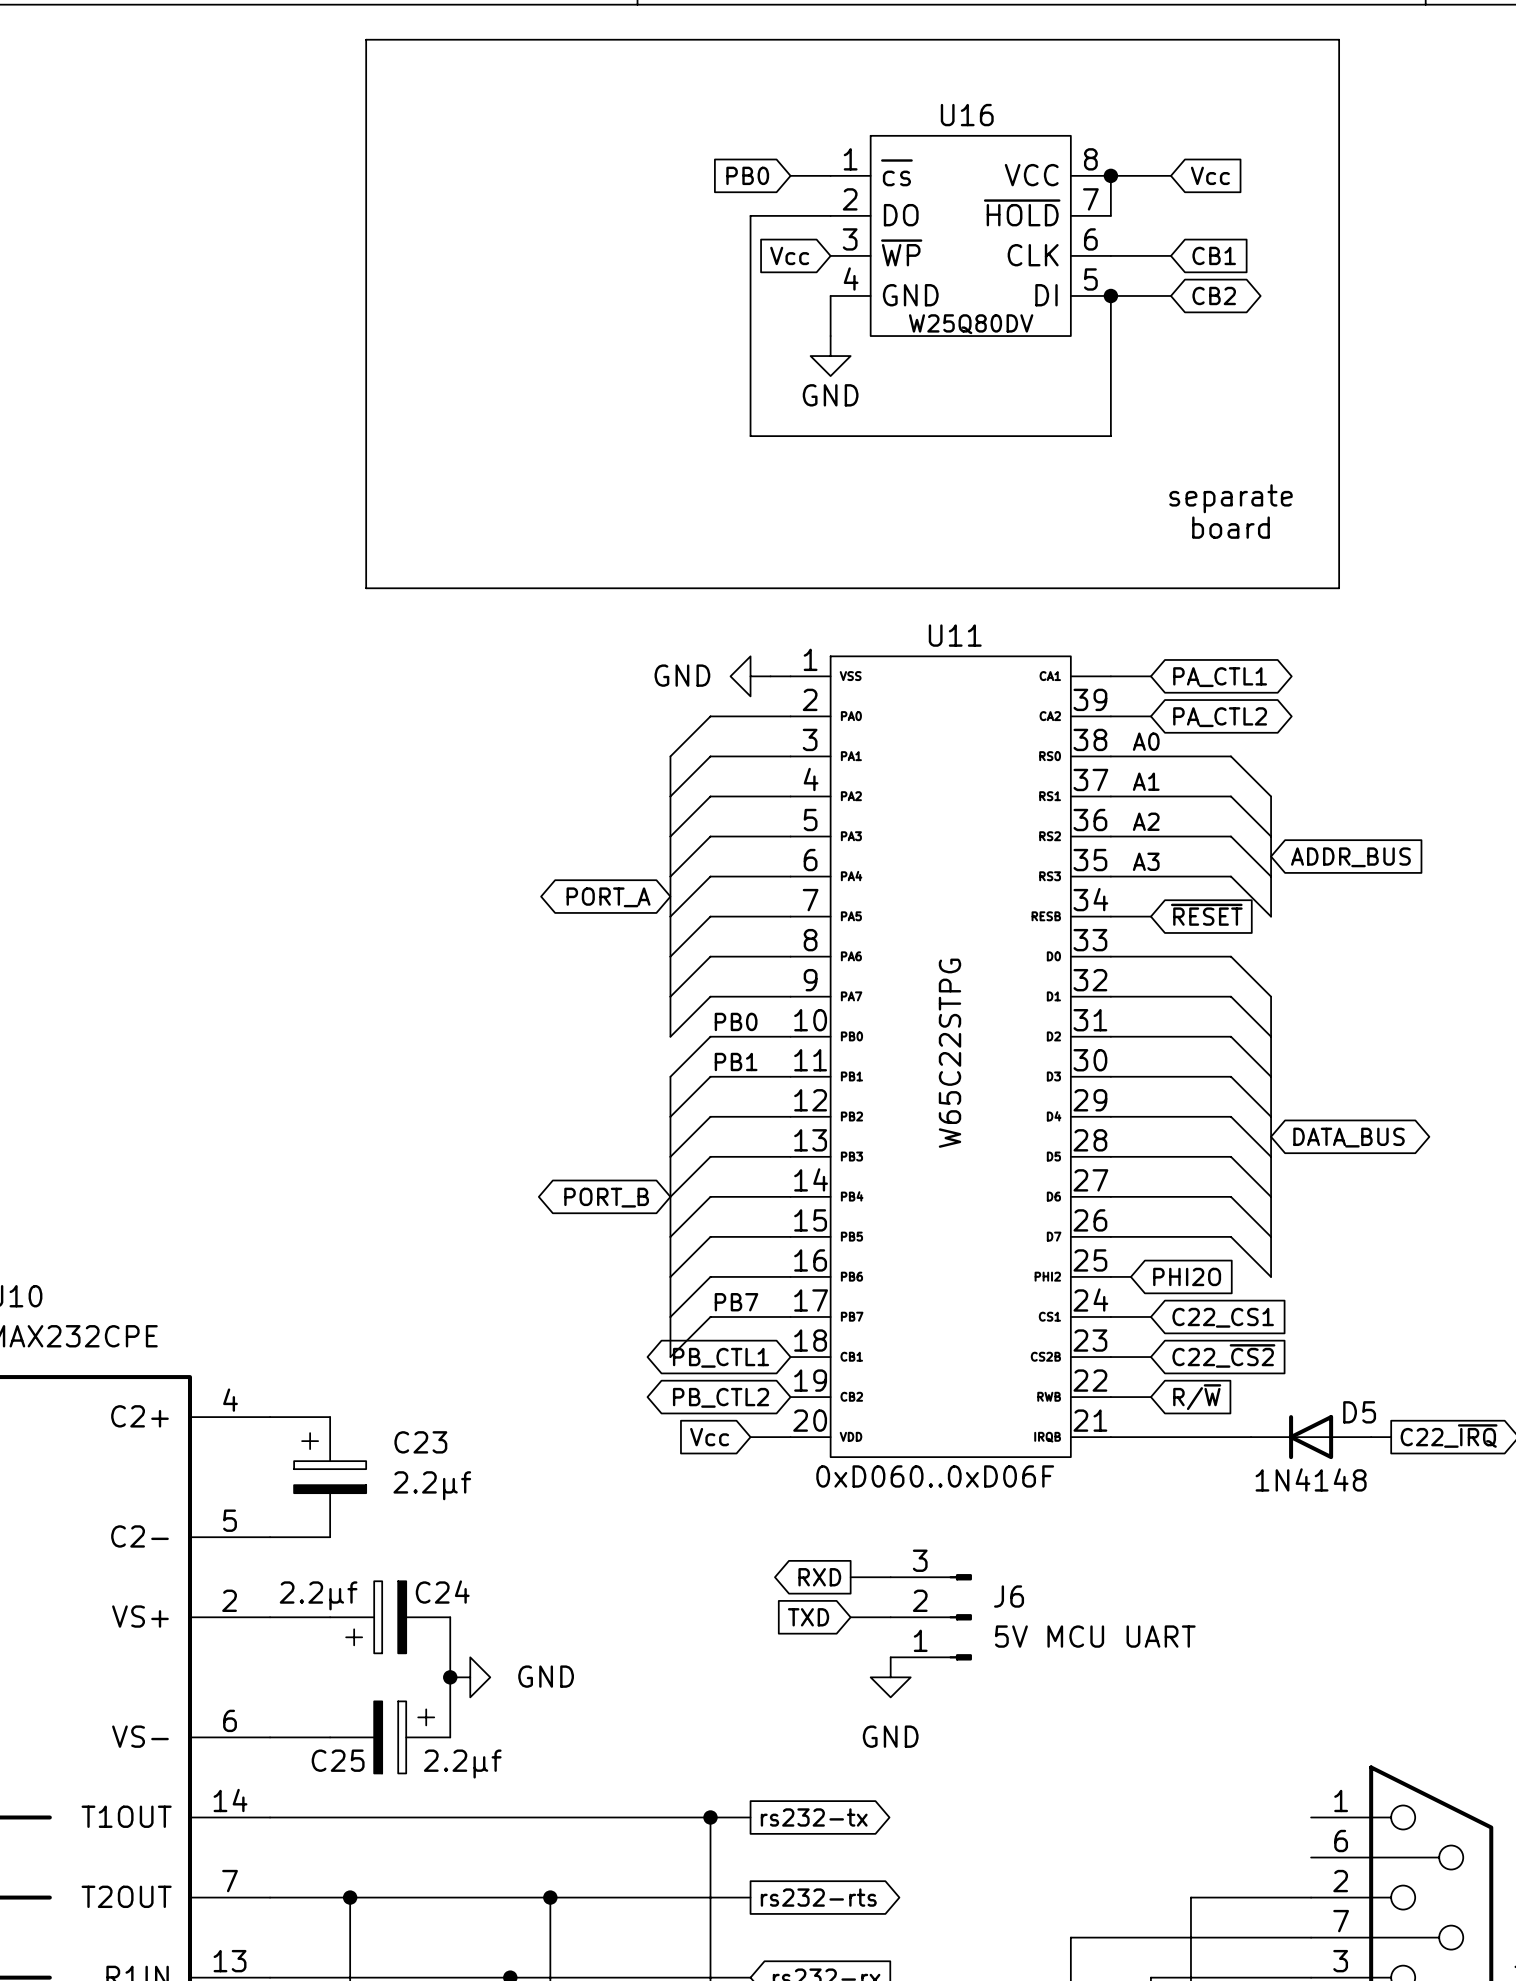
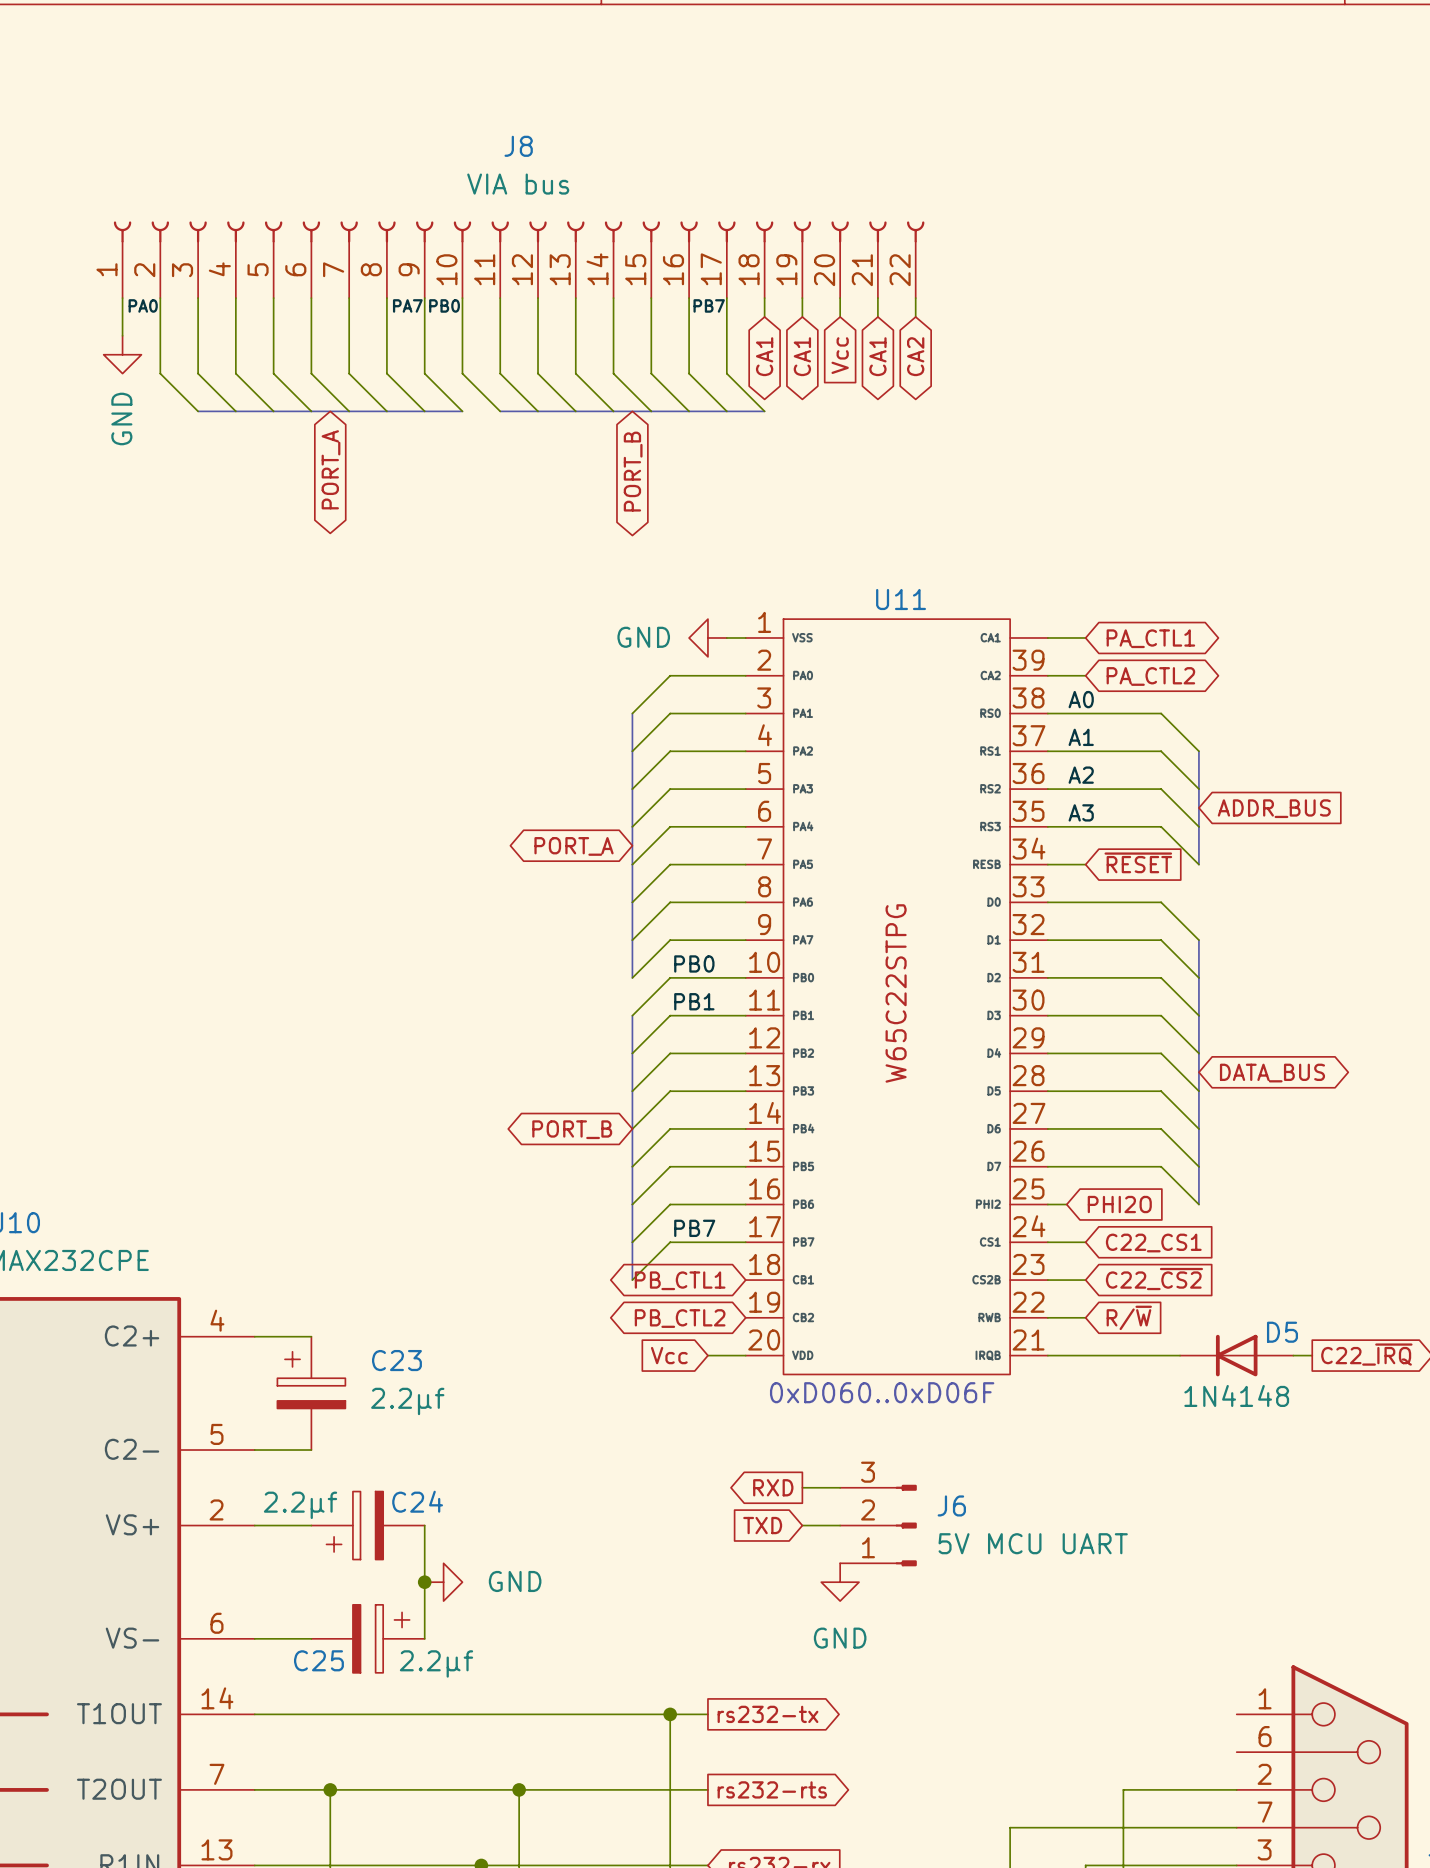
line: (366, 39) (1339, 39) (1339, 588) (366, 588) (366, 39) -> none
global label: PB0 (747, 175) -> none
wire: (790, 175) (830, 175) -> none
junction: (1110, 175) -> none
wire: (1170, 175) (1110, 175) (1110, 215) -> none
global label: Vcc (1210, 175) -> none
wire: (830, 215) (750, 215) (750, 436) (1110, 436) (1110, 295) (1170, 295) -> none
U16: (970, 235) -> none
global label rotation: 0° (789, 255) -> 90° counterclockwise (840, 355)
global label position: Vcc (789, 255) -> Vcc (840, 355)
wire: (1110, 255) (1170, 255) -> none
global label: CB1 (1214, 255) -> none
J8: none -> VIA bus (519, 259)
wire: (830, 295) (830, 336) -> none
junction: (1110, 295) -> none
global label: CB2 (1214, 295) -> none
wire: none -> (122, 298) (122, 335)
wire: none -> (160, 298) (160, 373) (198, 411)
wire: none -> (198, 298) (198, 373) (235, 411)
wire: none -> (235, 298) (235, 373) (273, 411)
wire: none -> (273, 298) (273, 373) (311, 411)
wire: none -> (311, 298) (311, 373) (349, 411)
wire: none -> (349, 298) (349, 373) (386, 411)
wire: none -> (386, 298) (386, 373) (424, 411)
wire: none -> (424, 298) (424, 373) (462, 411)
wire: none -> (462, 298) (462, 373) (500, 411)
wire: none -> (500, 298) (500, 373) (538, 411)
wire: none -> (538, 298) (538, 373) (575, 411)
wire: none -> (575, 298) (575, 373) (613, 411)
wire: none -> (613, 298) (613, 373) (651, 411)
wire: none -> (651, 298) (651, 373) (689, 411)
wire: none -> (689, 298) (689, 373) (726, 411)
wire: none -> (726, 298) (726, 373) (764, 411)
wire: none -> (764, 298) (764, 316)
wire: none -> (802, 298) (802, 316)
wire: none -> (840, 298) (840, 316)
wire: none -> (877, 298) (877, 316)
label: none -> PA0 (143, 305)
label: none -> PA7 (407, 305)
label: none -> PB0 (444, 305)
label: none -> PB7 (709, 305)
power symbol: GND (830, 356) -> none
power symbol: none -> GND (122, 354)
global label: none -> CA1 (764, 356)
global label: none -> CA1 (802, 356)
global label: none -> CA1 (877, 356)
global label: none -> CA2 (915, 356)
bus: none -> (198, 411) (462, 411)
bus: none -> (500, 411) (764, 411)
global label: none -> PORT_A (331, 469)
text: separate (1231, 498) -> none
global label: none -> PORT_B (633, 471)
text: board (1231, 527) -> none

